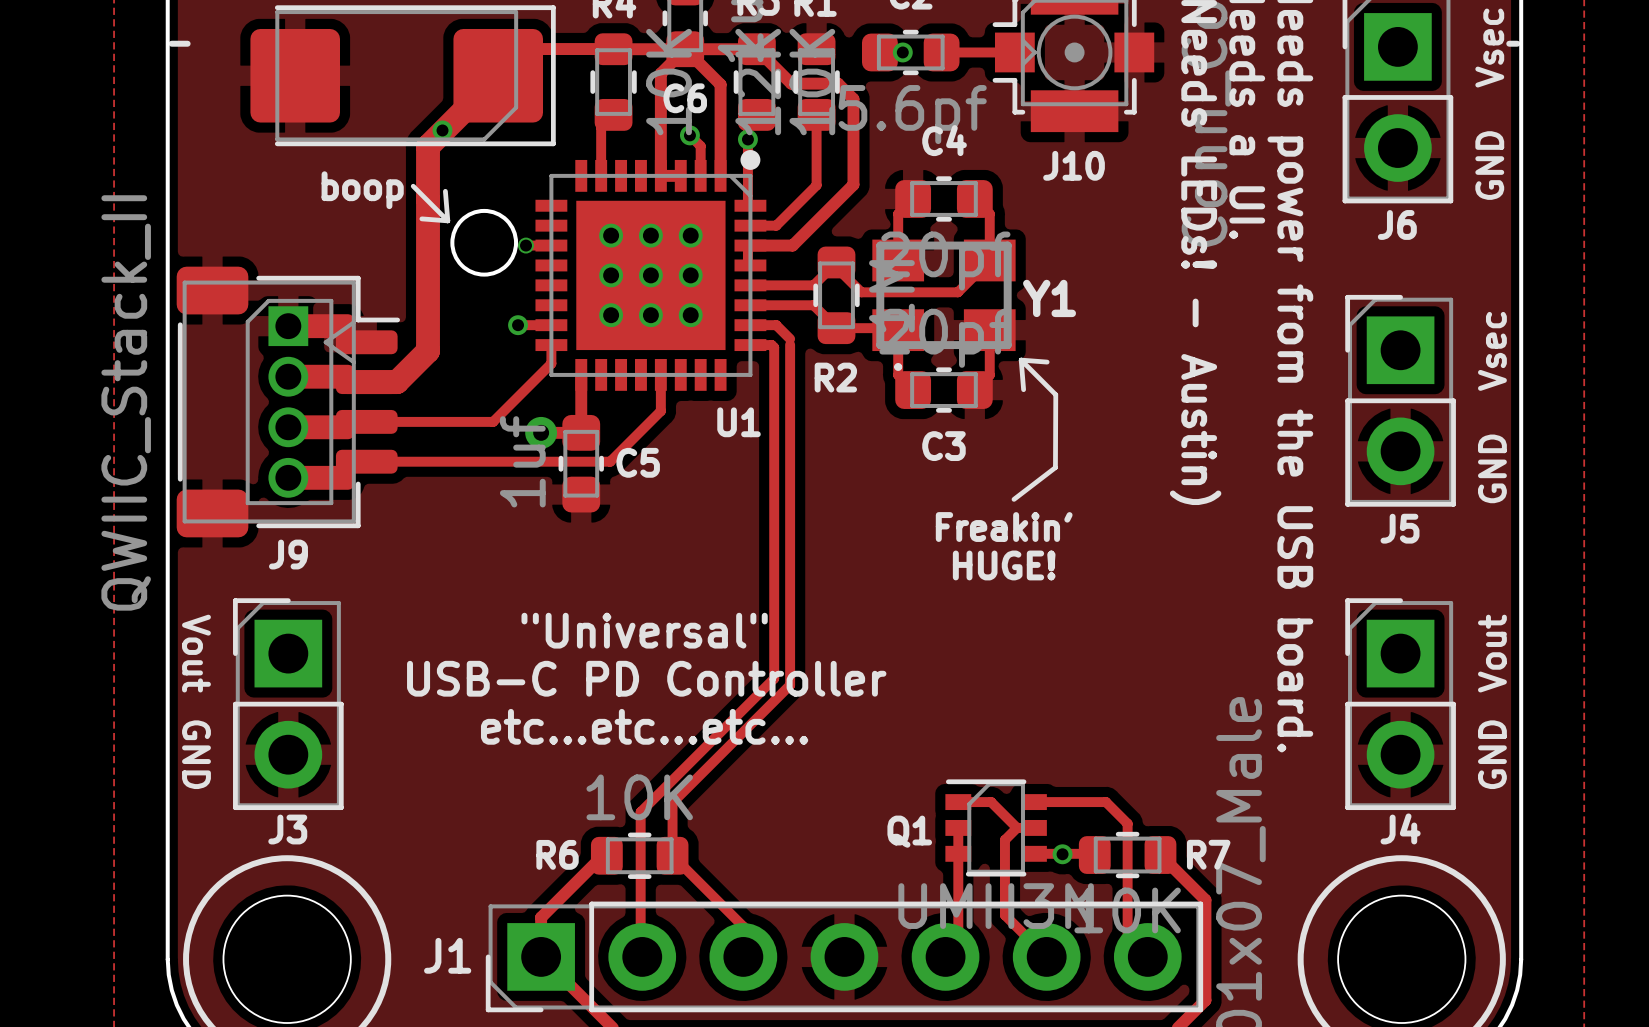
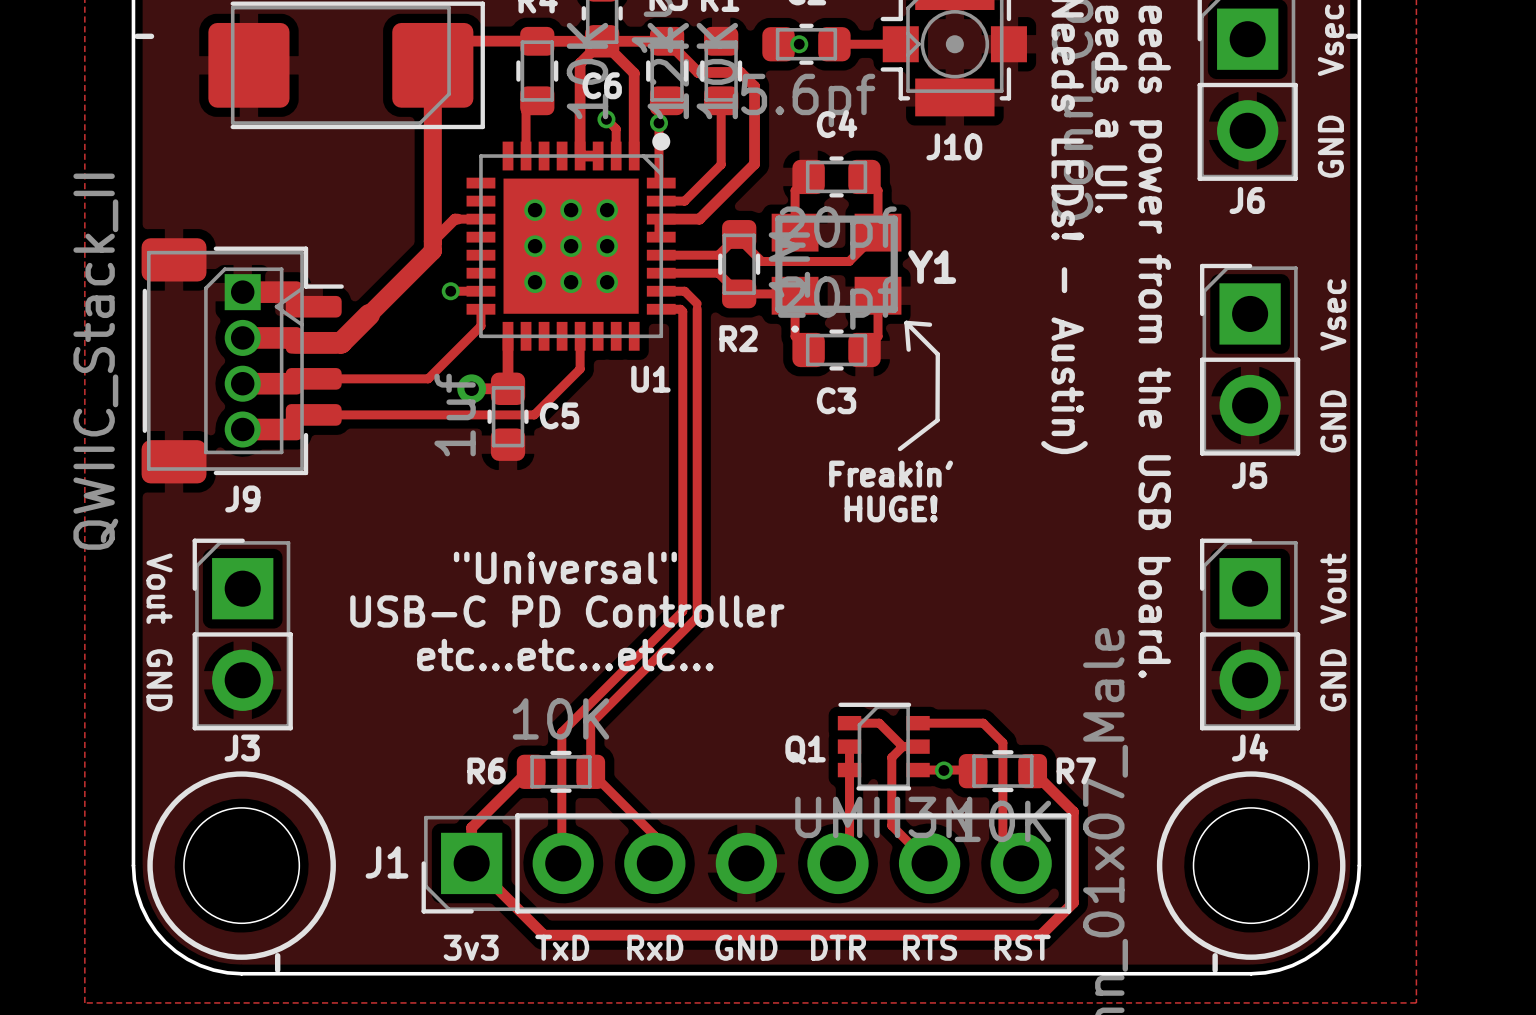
track: (498, 76) (428, 146) (428, 351) -> (432, 65) (432, 251) (369, 314)
via: (442, 130) -> none
line: (413, 186) (447, 220) -> none
text: boop (362, 190) -> none
line: (445, 191) (447, 220) -> none
round board edge: [450, 208, 519, 277] -> none
line: (421, 218) (447, 220) -> none
track: none -> (457, 219) (454, 219) (432, 241)
via: (525, 245) -> none

